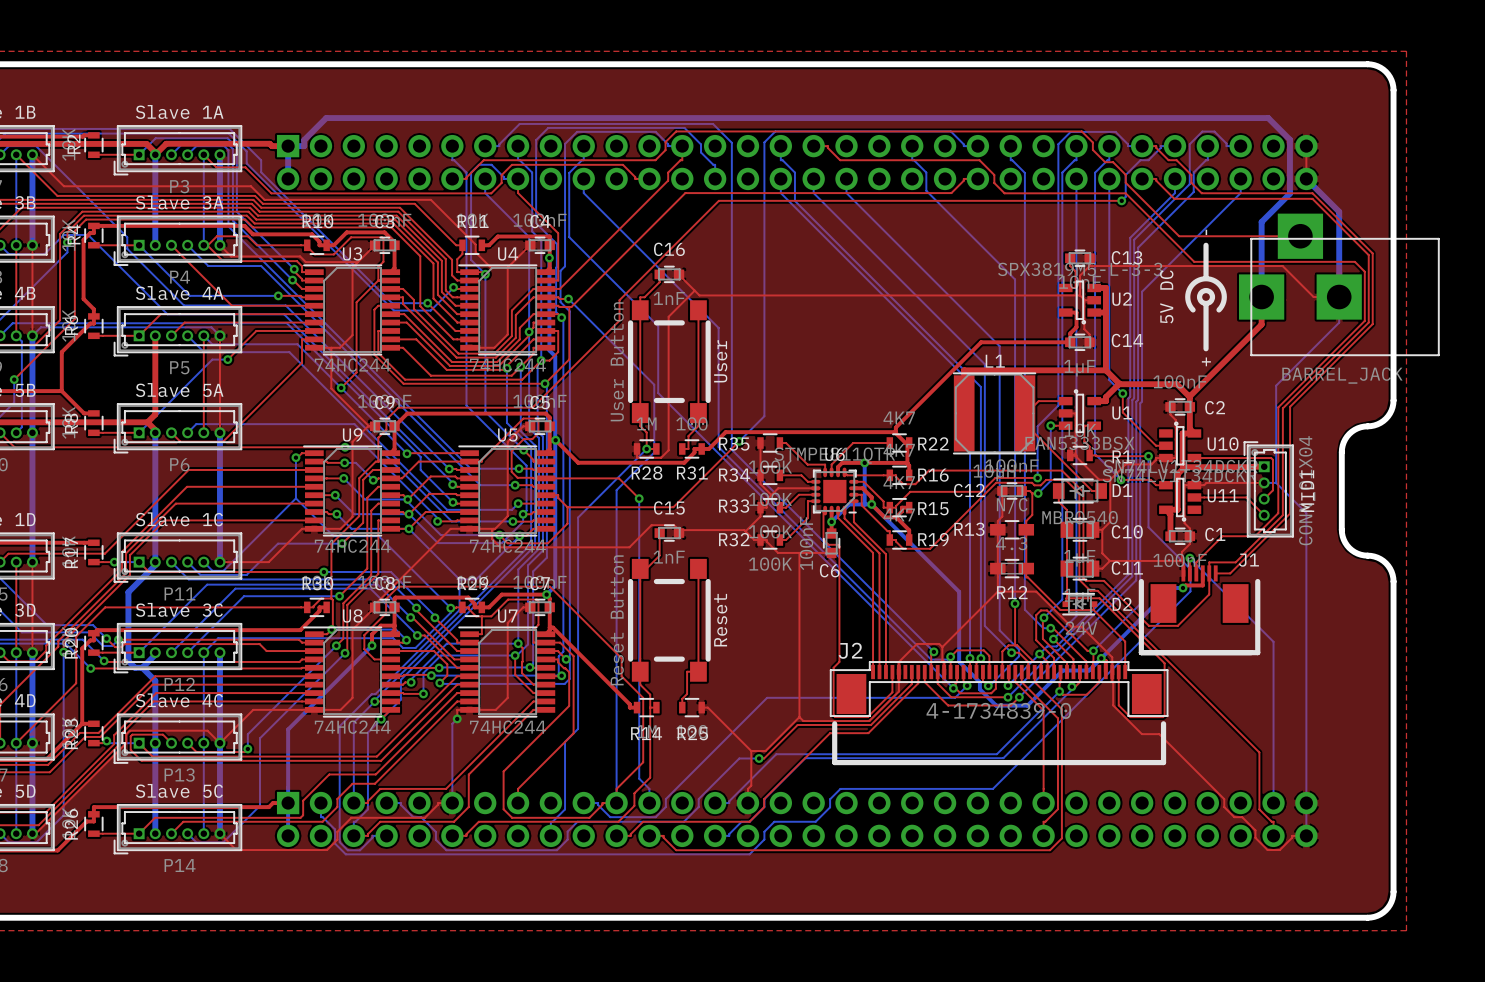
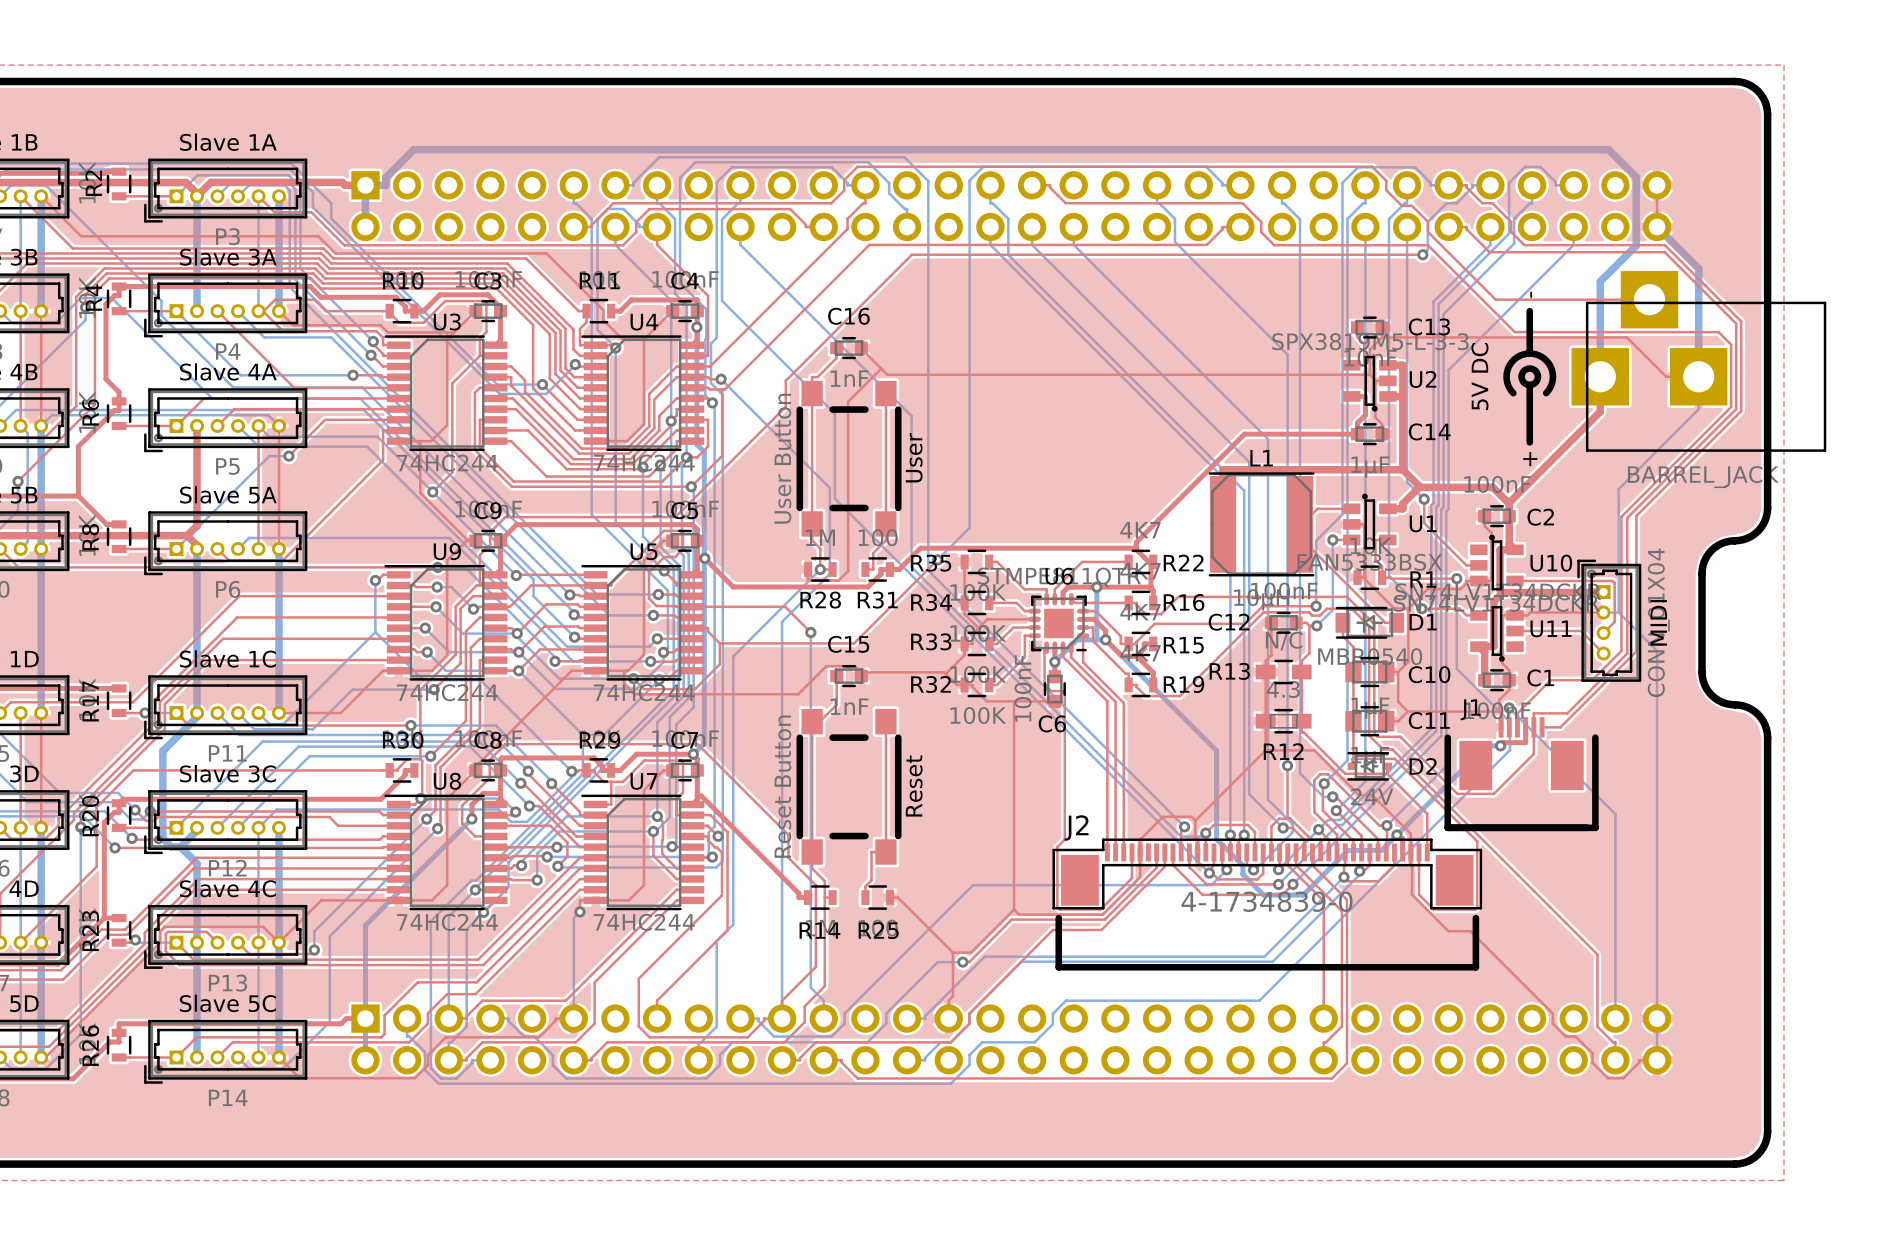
J1 name position: J1 (1248, 560) -> J1 (1470, 709)

